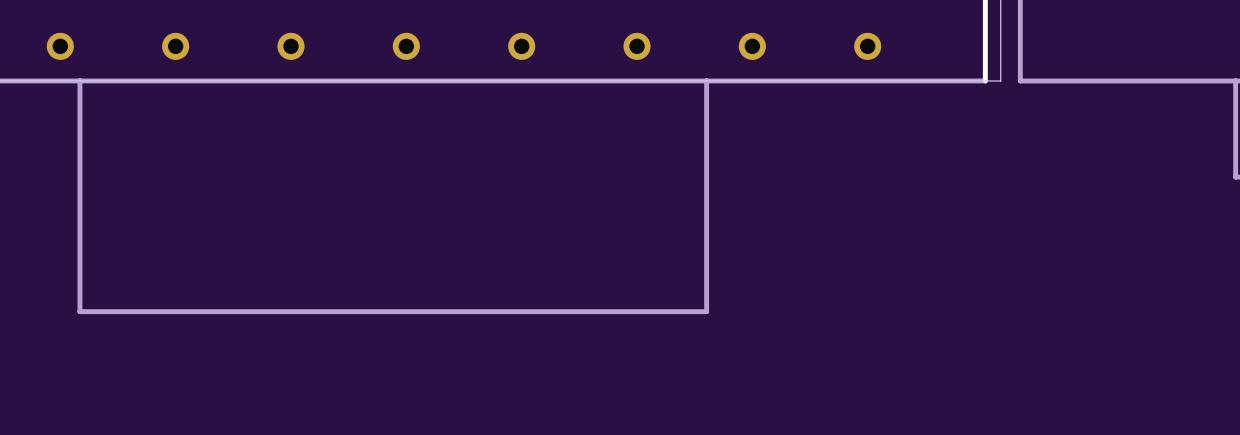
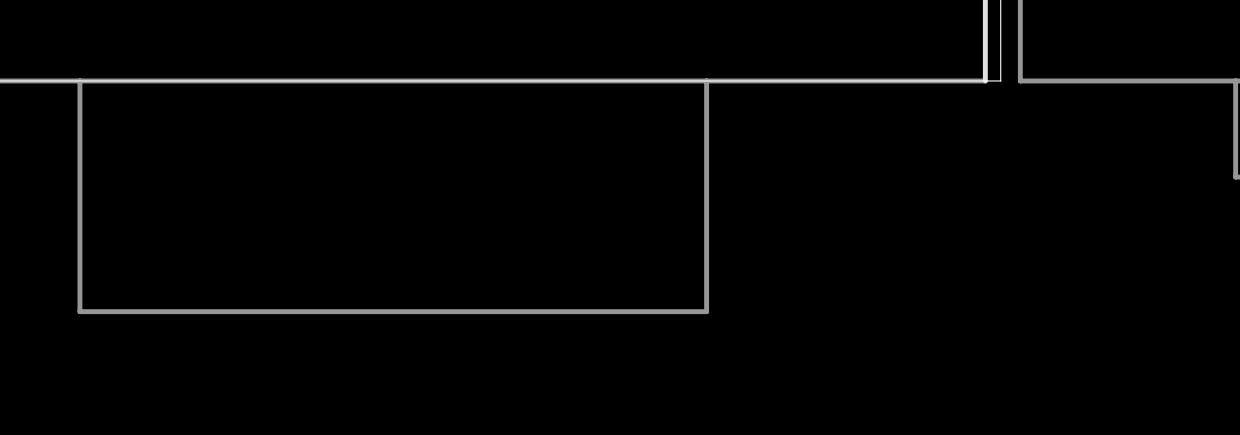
via: (60, 46) -> none
via: (175, 46) -> none
via: (291, 46) -> none
via: (406, 46) -> none
via: (521, 46) -> none
via: (637, 46) -> none
via: (752, 46) -> none
via: (867, 46) -> none

